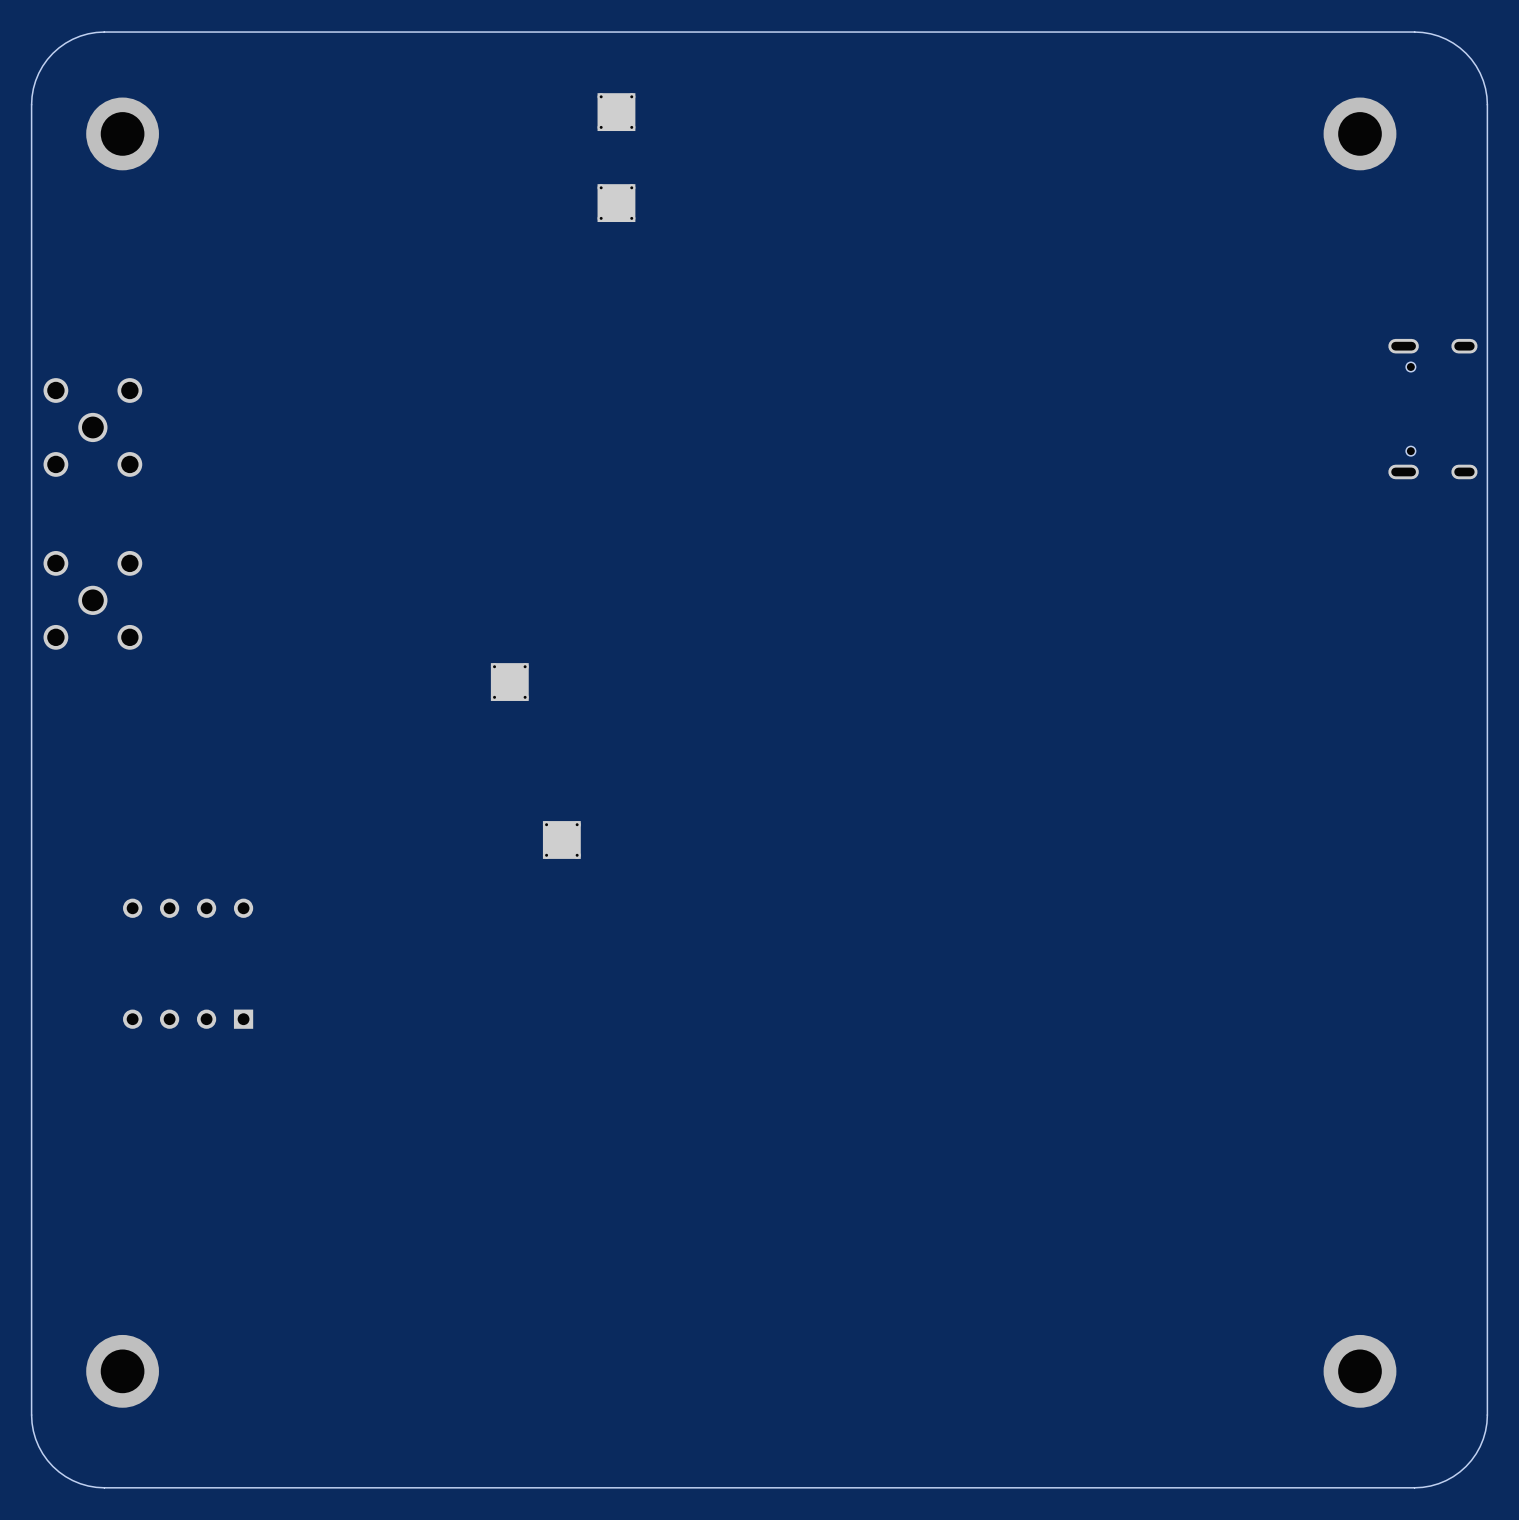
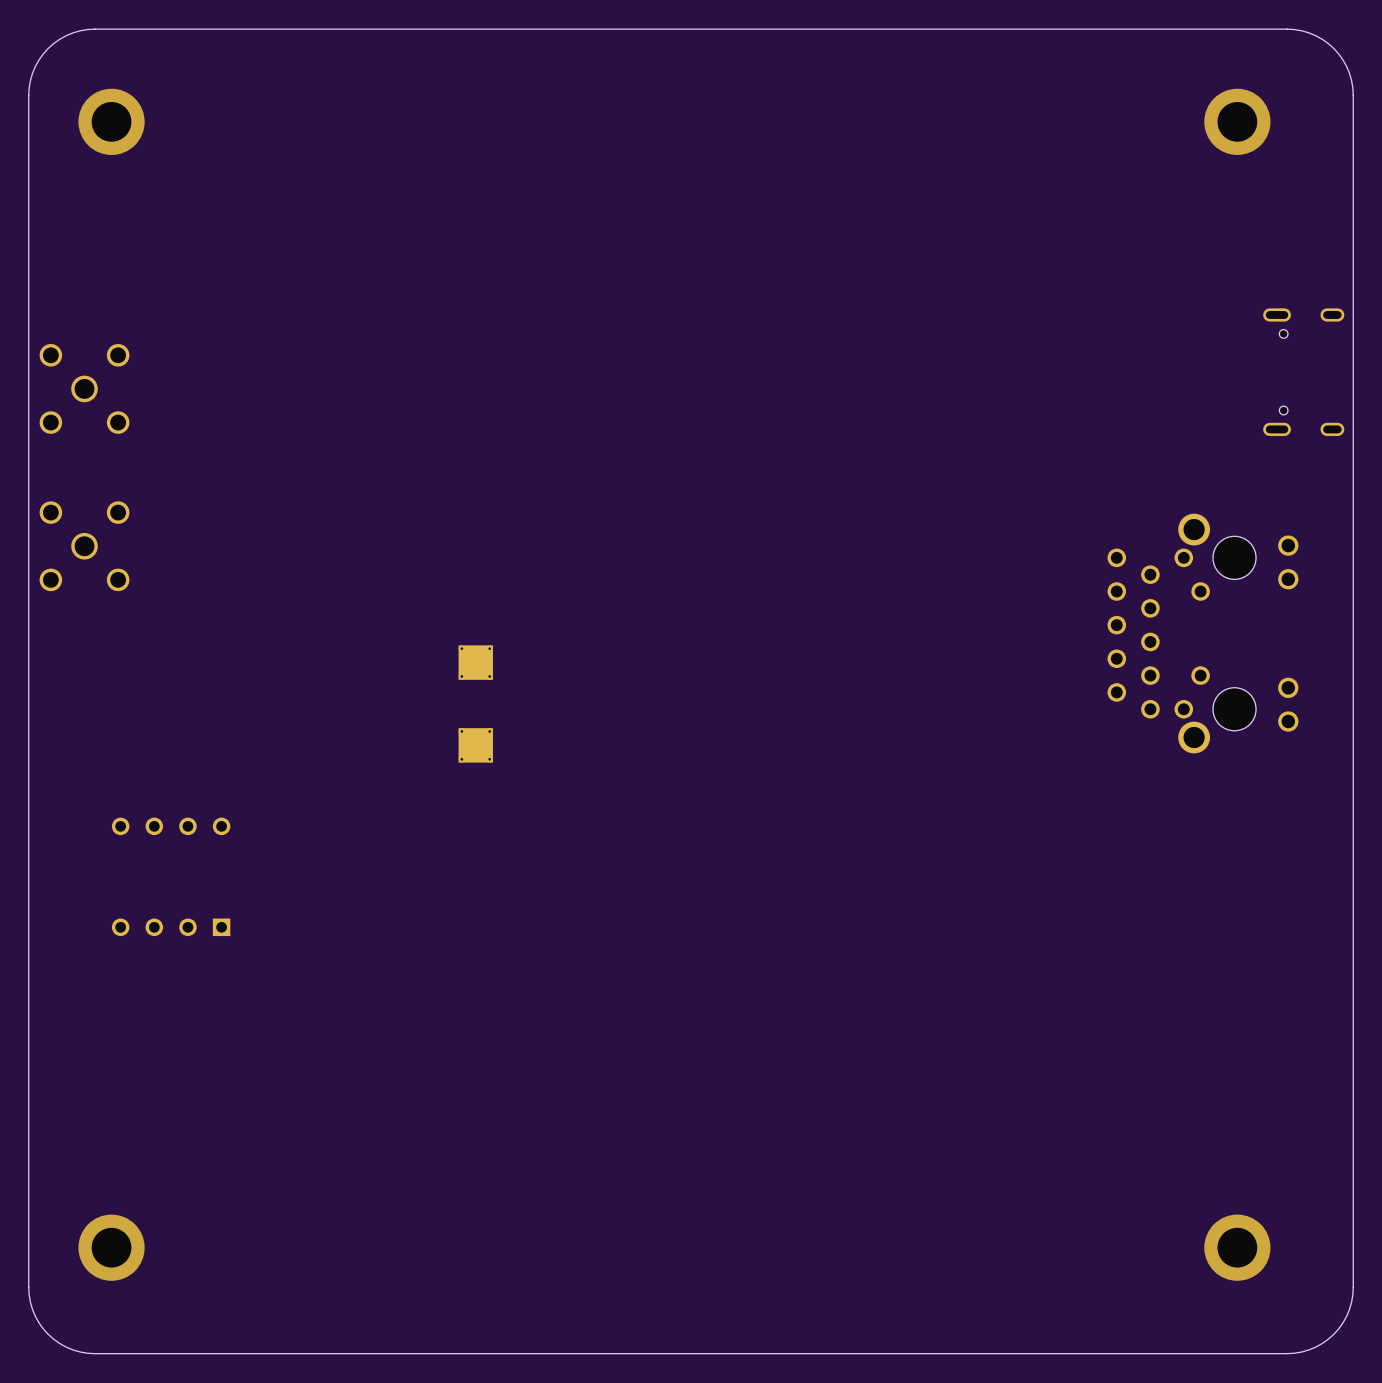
part: (616, 112) -> none
part: (616, 203) -> none
part position: (509, 682) -> (475, 662)
part: none -> (1202, 633)
part position: (561, 839) -> (475, 745)

